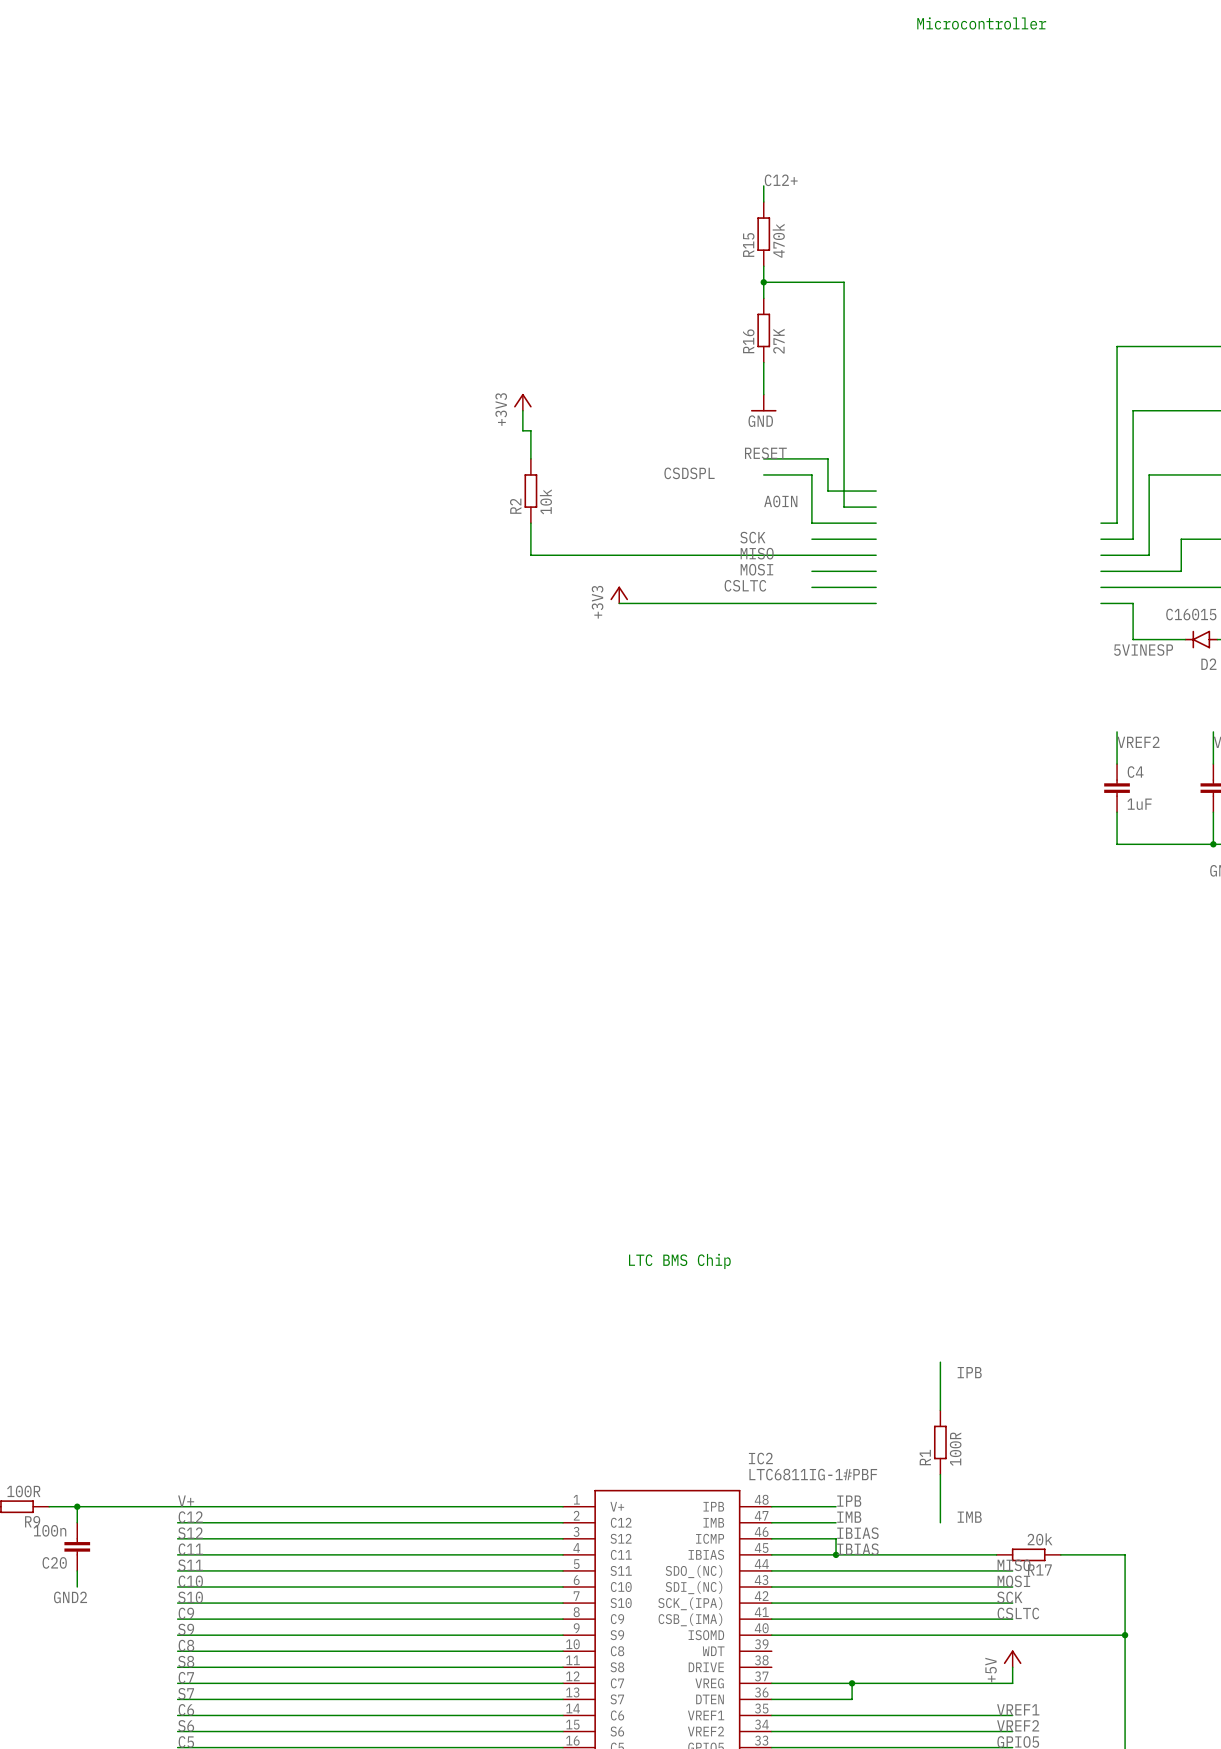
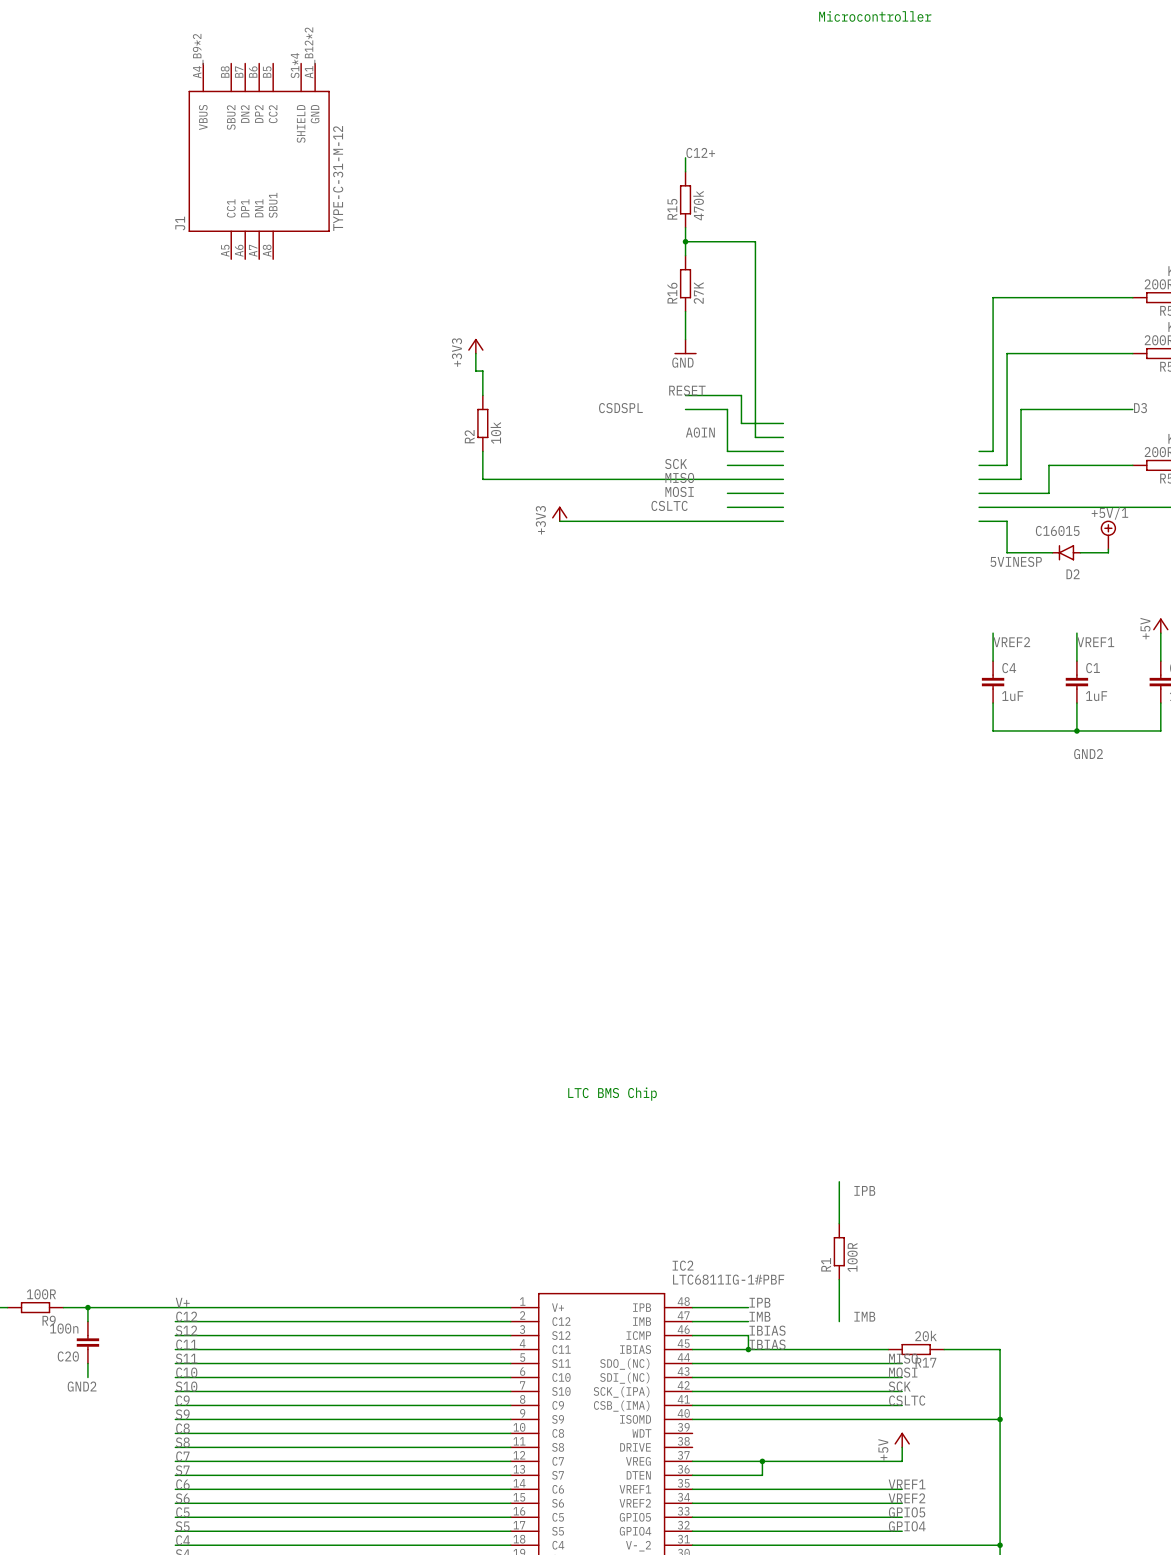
J1: none -> TYPE-C-31-M-12 (259, 161)

